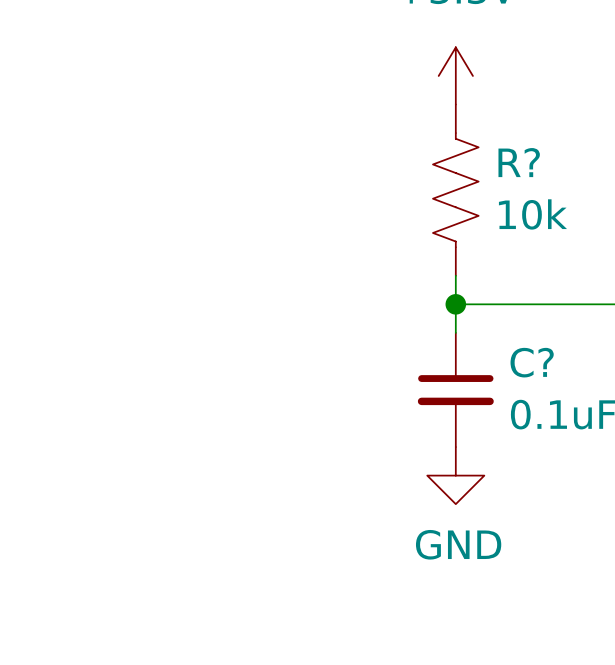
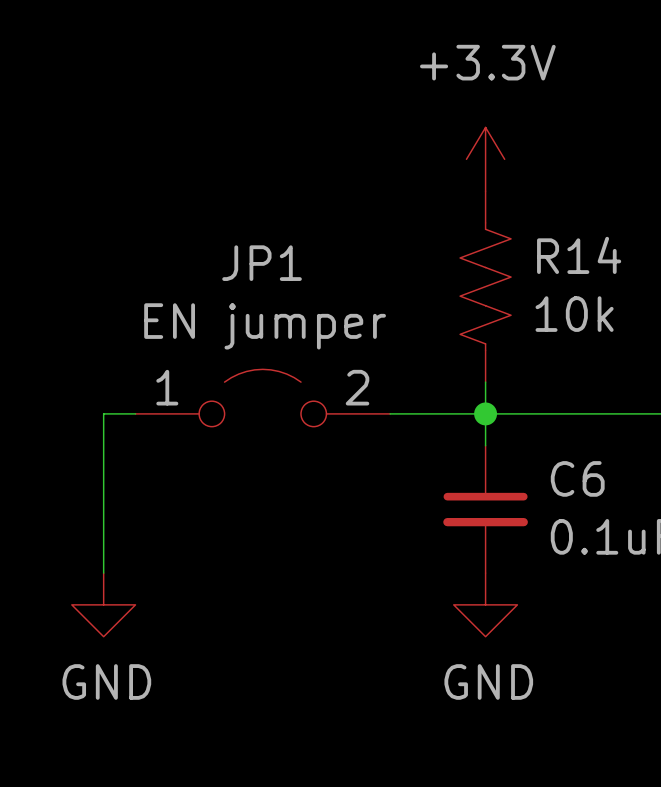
R? name: R? (519, 162) -> R14 (579, 255)
JP1: none -> EN jumper (262, 398)
wire: none -> (135, 413) (103, 413) (103, 573)
wire: none -> (390, 413) (485, 413)
C? name: C? (532, 362) -> C6 (577, 478)
power symbol: none -> GND (103, 604)

